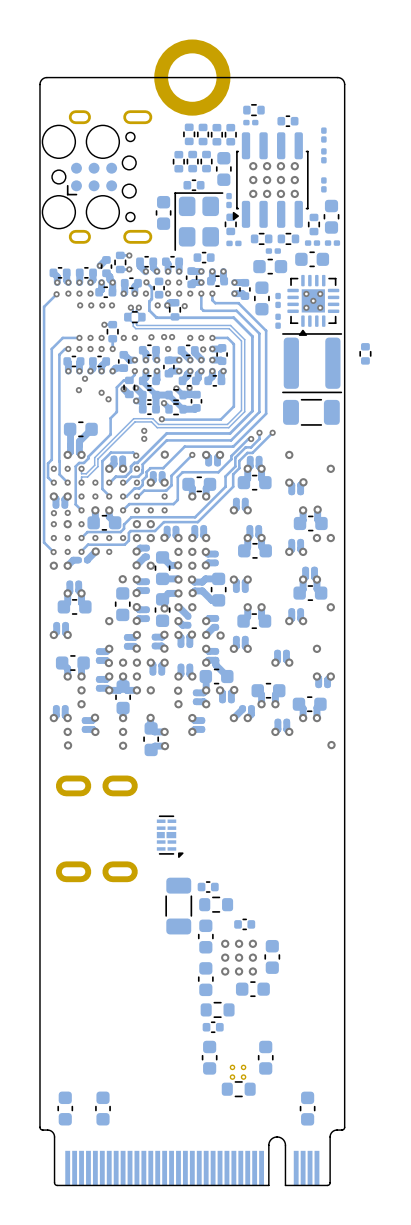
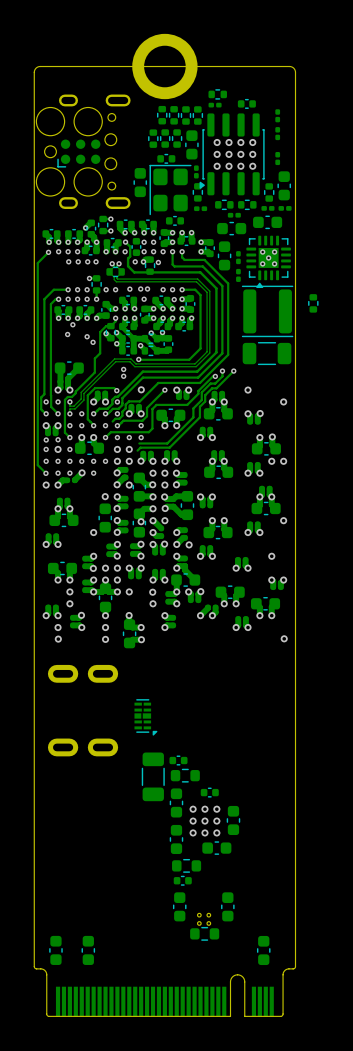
track: (131, 491) (126, 496) (123, 496) -> none
track: (162, 517) (131, 517) (124, 524) (124, 528) (120, 532) (87, 532) (81, 538) -> none
track: (160, 525) (155, 531) (130, 531) (128, 540) (124, 544) (88, 544) (81, 551) -> none

